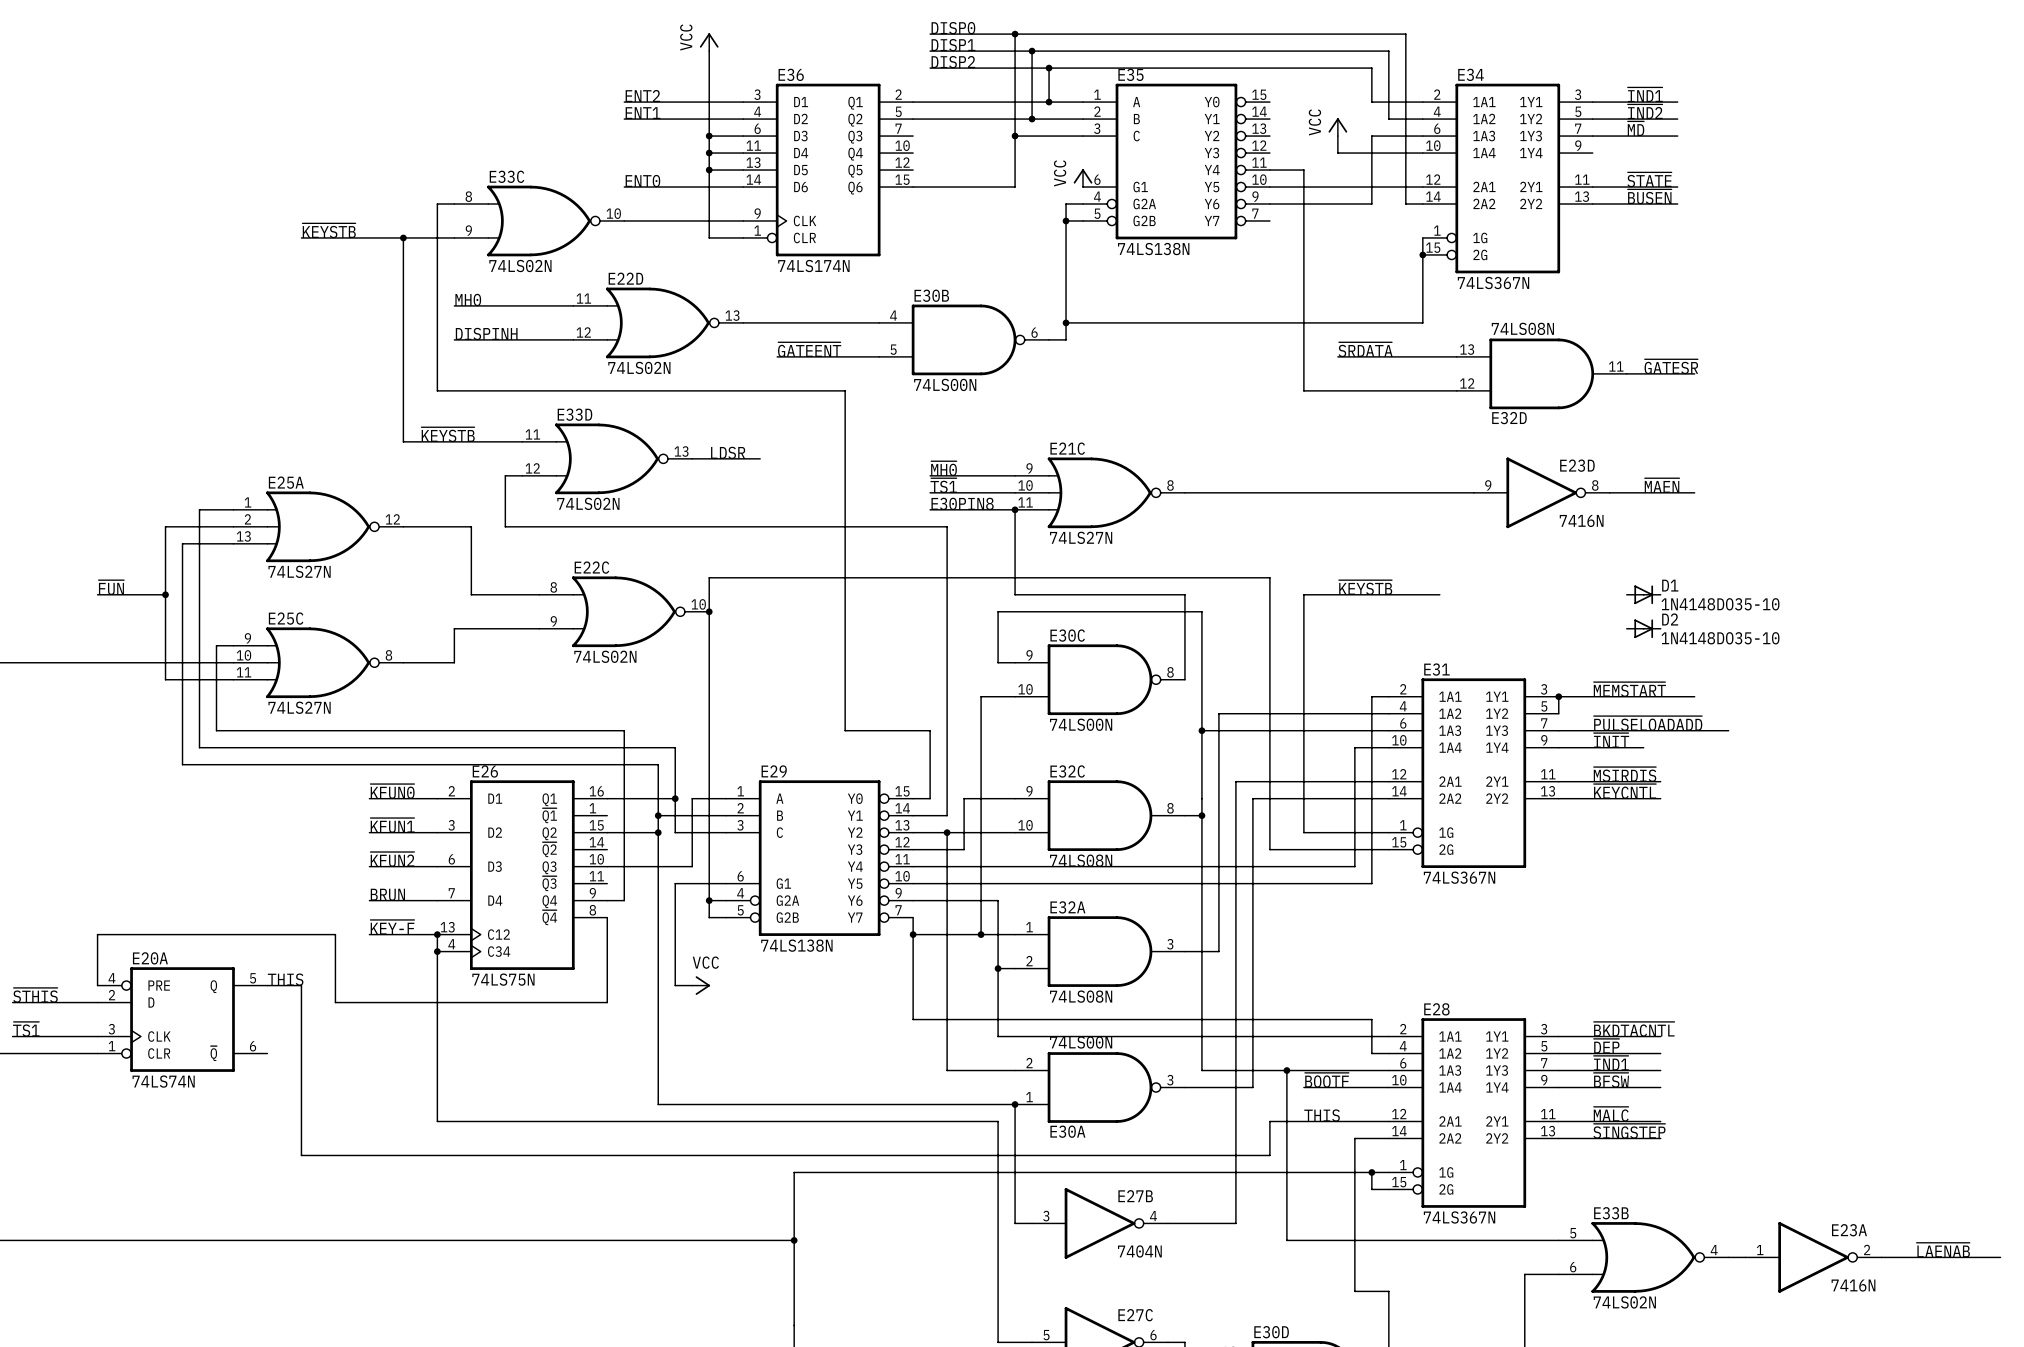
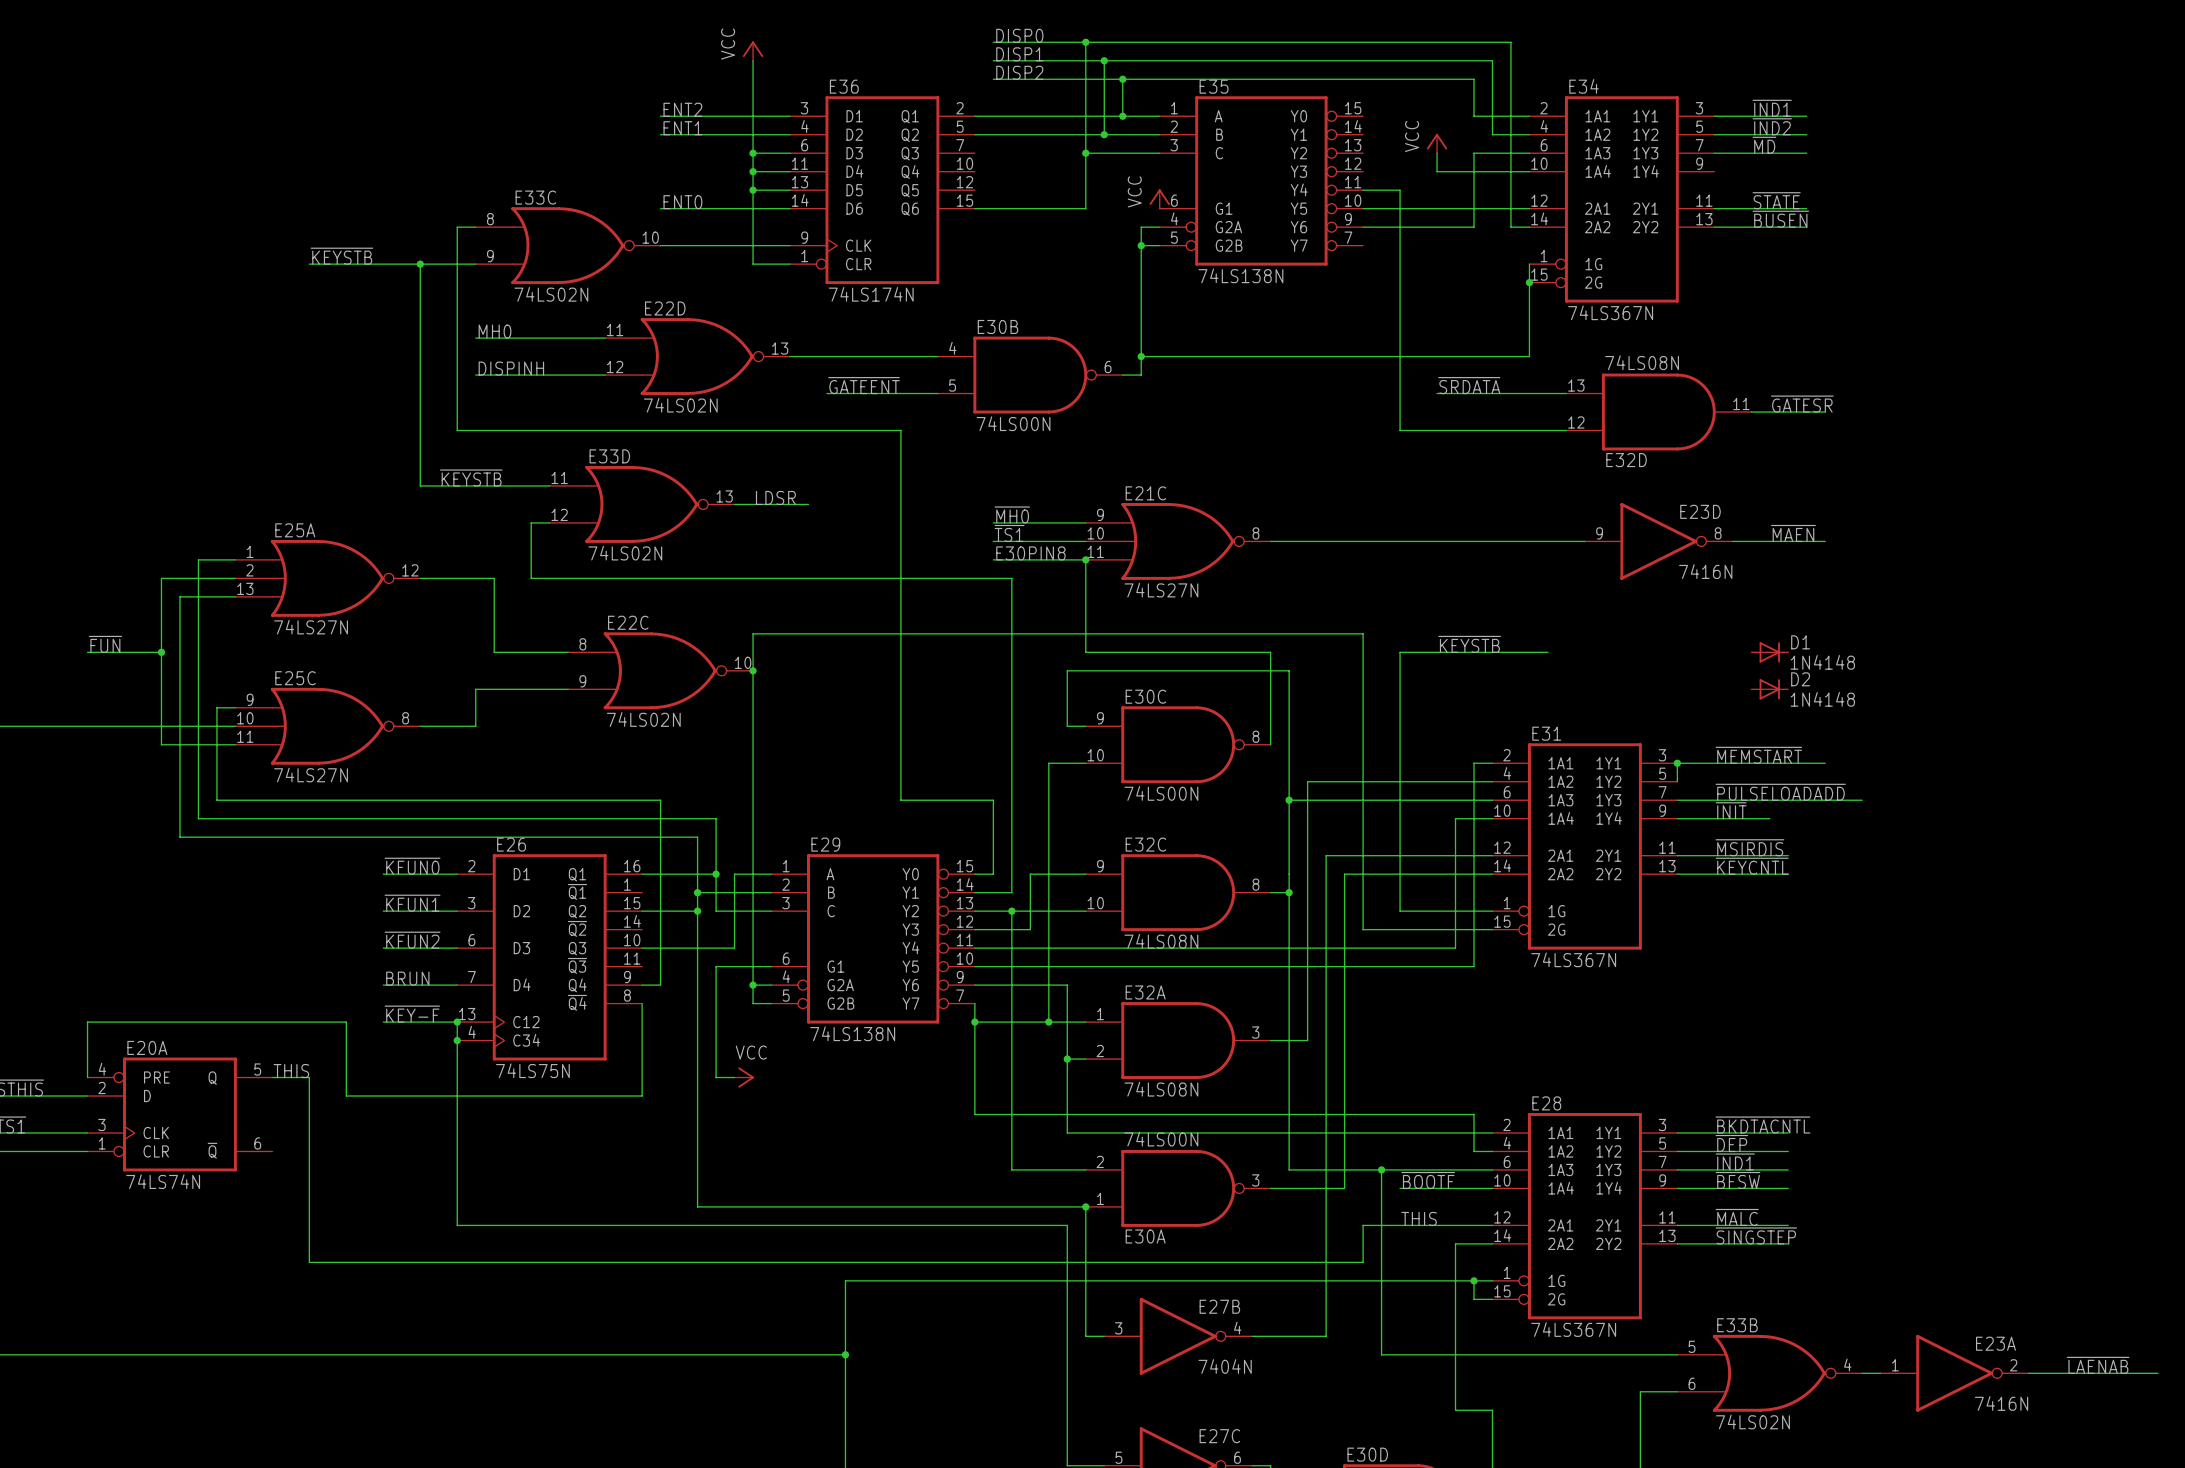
D1 value: 1N4148DO35-10 (1720, 604) -> 1N4148 (1822, 662)
D2 value: 1N4148DO35-10 (1720, 638) -> 1N4148 (1822, 699)

